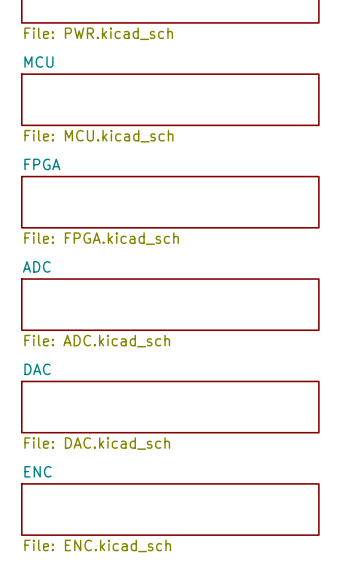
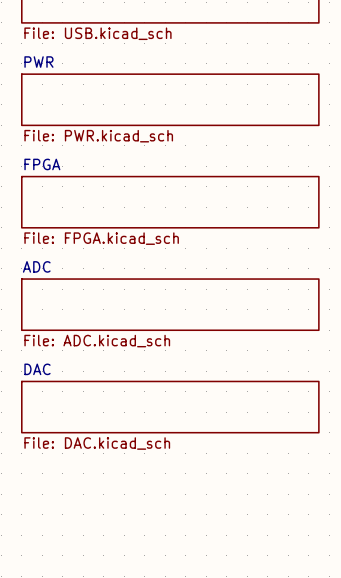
sheet value: File: PWR.kicad_sch (98, 33) -> File: USB.kicad_sch (97, 33)
sheet MCU name: MCU (38, 62) -> PWR (38, 62)
sheet MCU value: File: MCU.kicad_sch (98, 136) -> File: PWR.kicad_sch (98, 136)
sheet ENC: File: ENC.kicad_sch (170, 509) -> none

